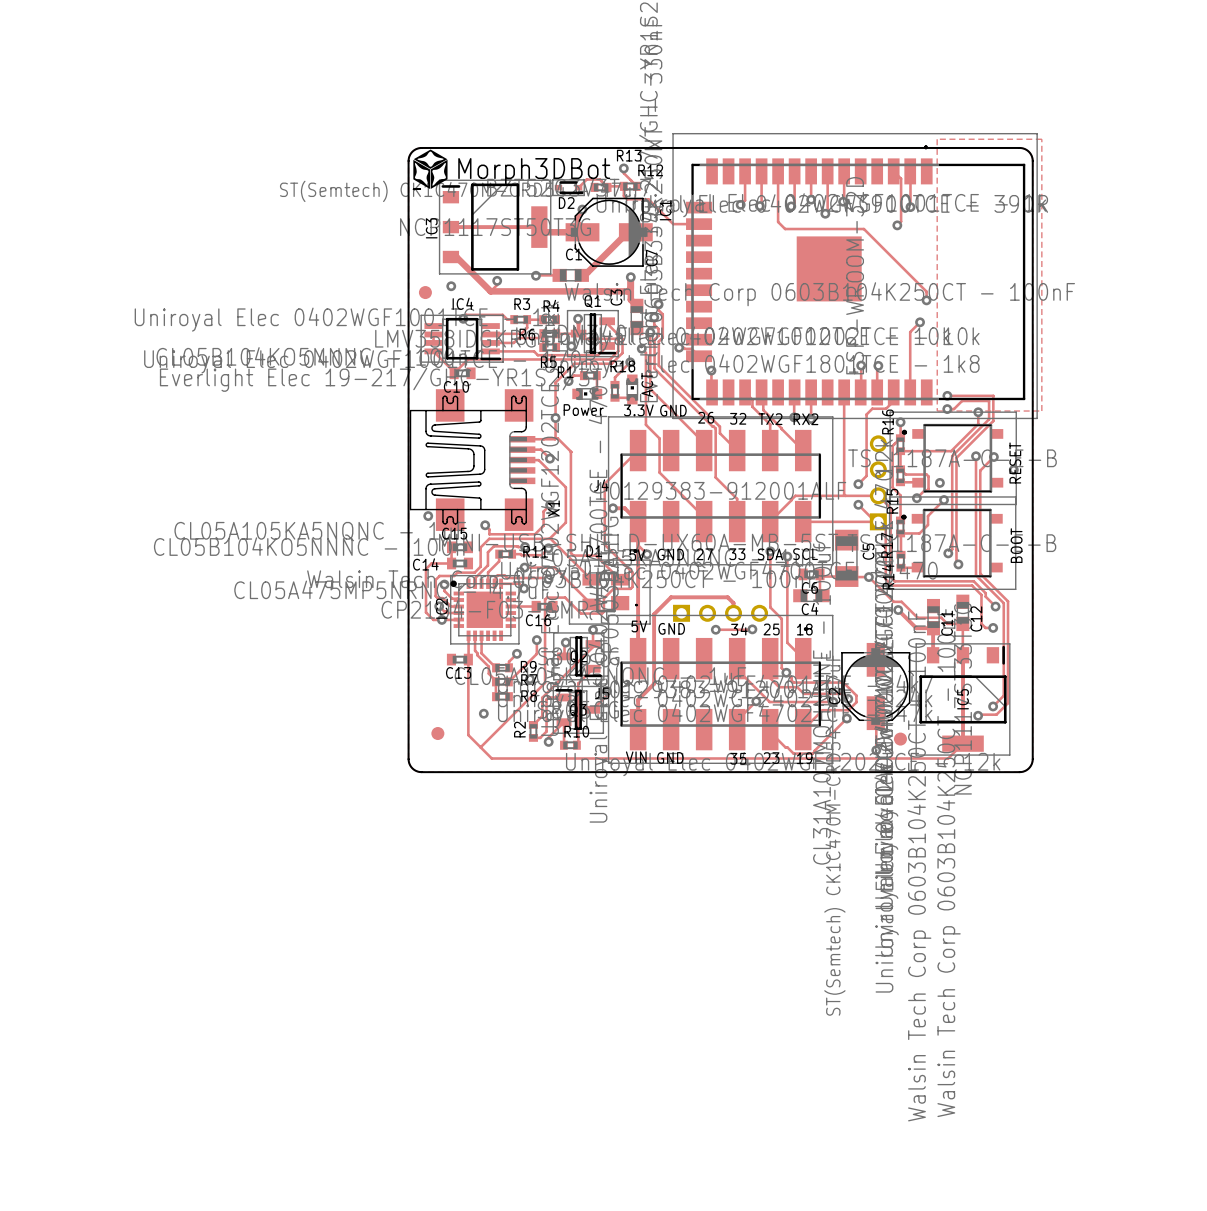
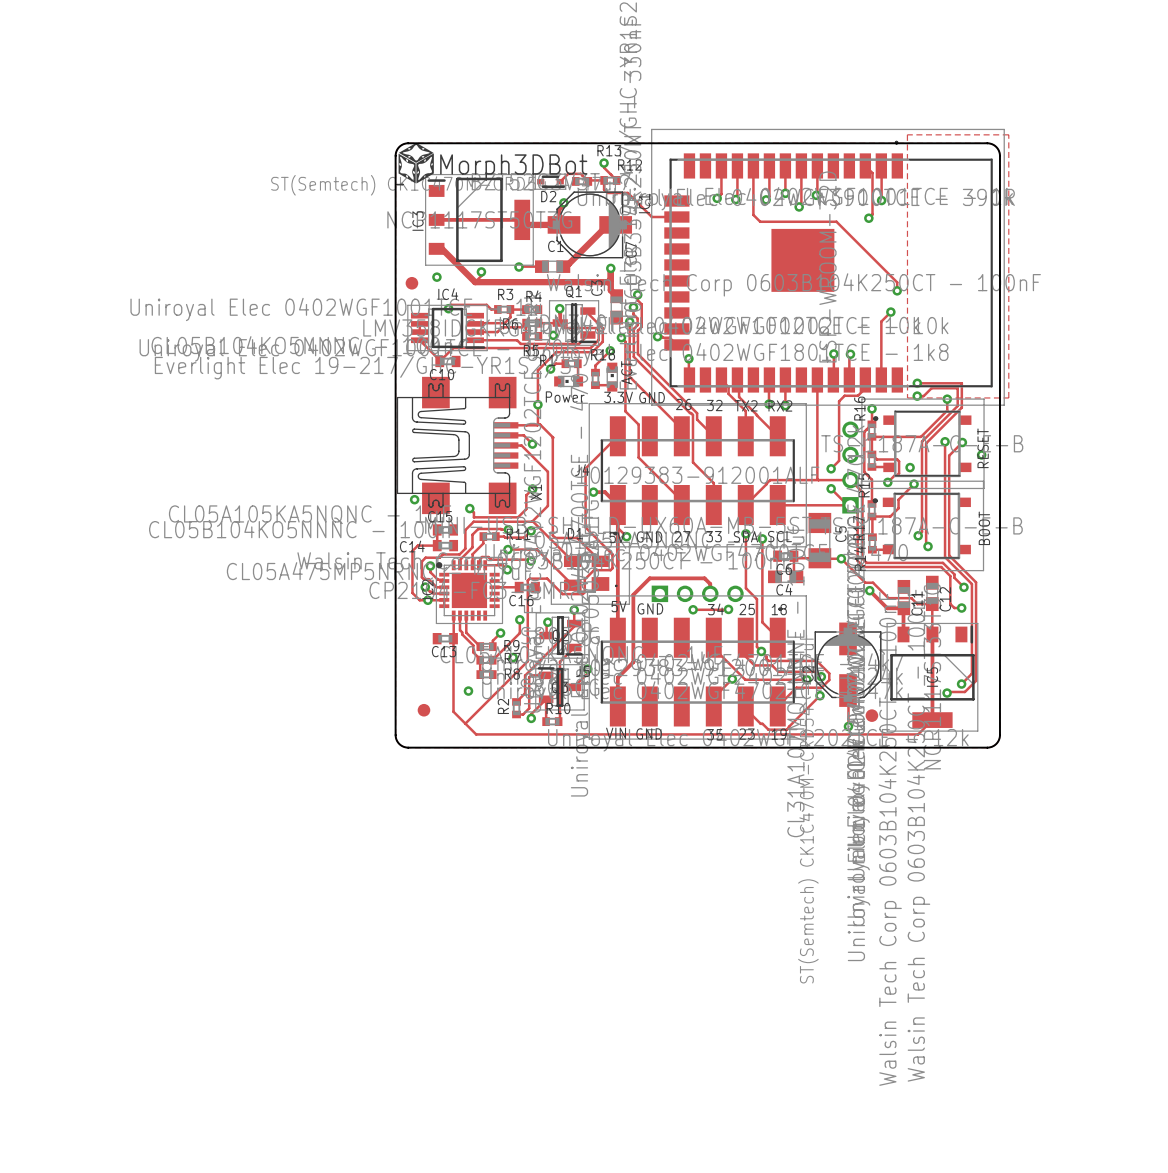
drawing shape: [413, 149, 611, 190] -> [396, 142, 588, 185]

